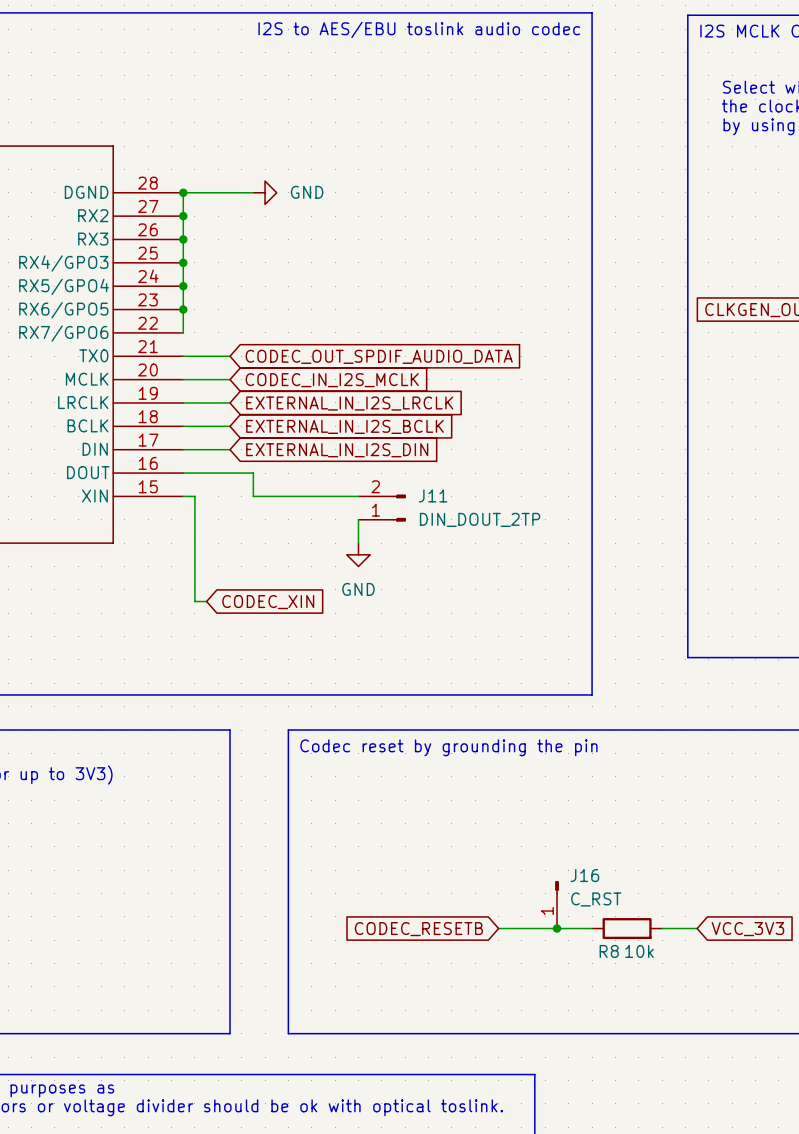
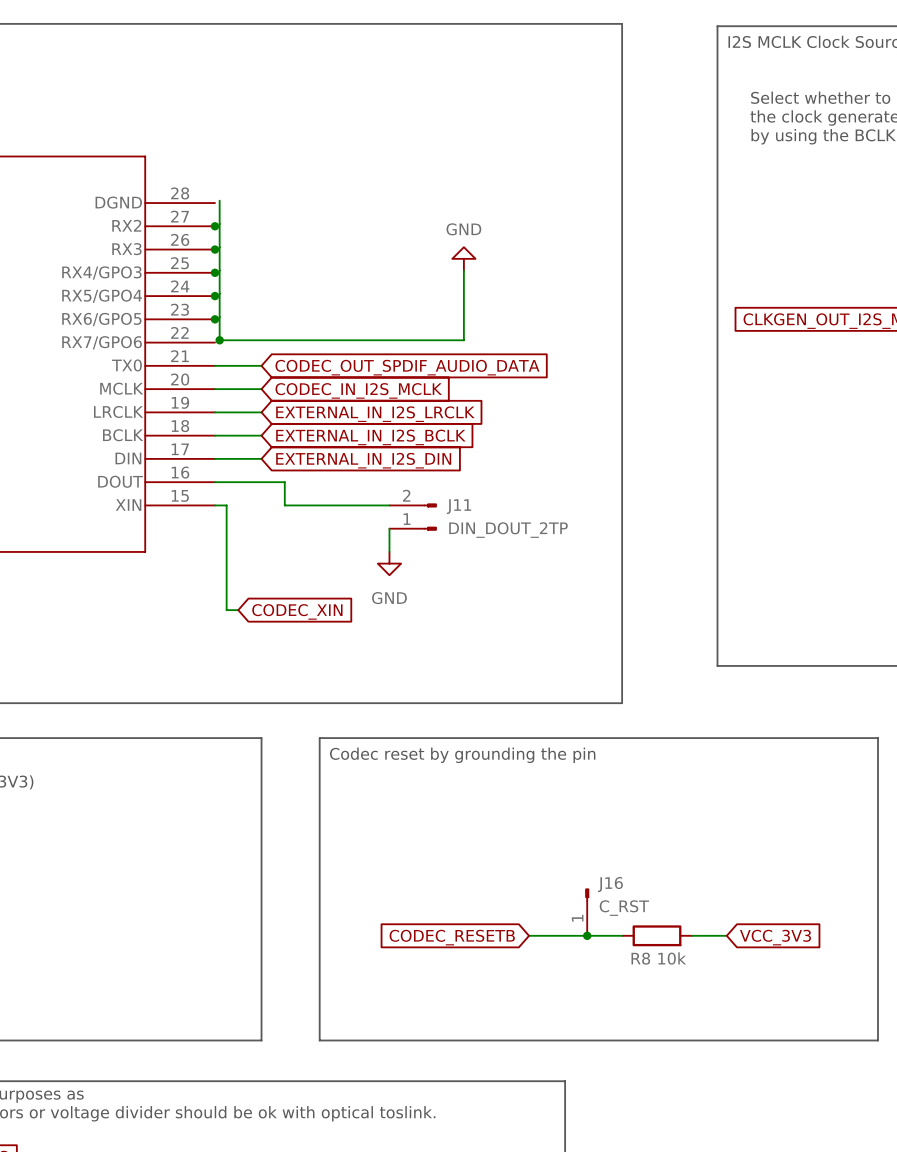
text: I2S to AES/EBU toslink audio codec (419, 29) -> none
wire: none -> (219, 200) (219, 340) (463, 340) (463, 270)
junction: (183, 192) -> none
wire: (253, 192) (183, 192) (183, 332) -> none
power symbol rotation: 0° (265, 192) -> 90° counterclockwise (463, 258)
power symbol position: GND (265, 192) -> GND (463, 258)
junction: none -> (219, 340)

